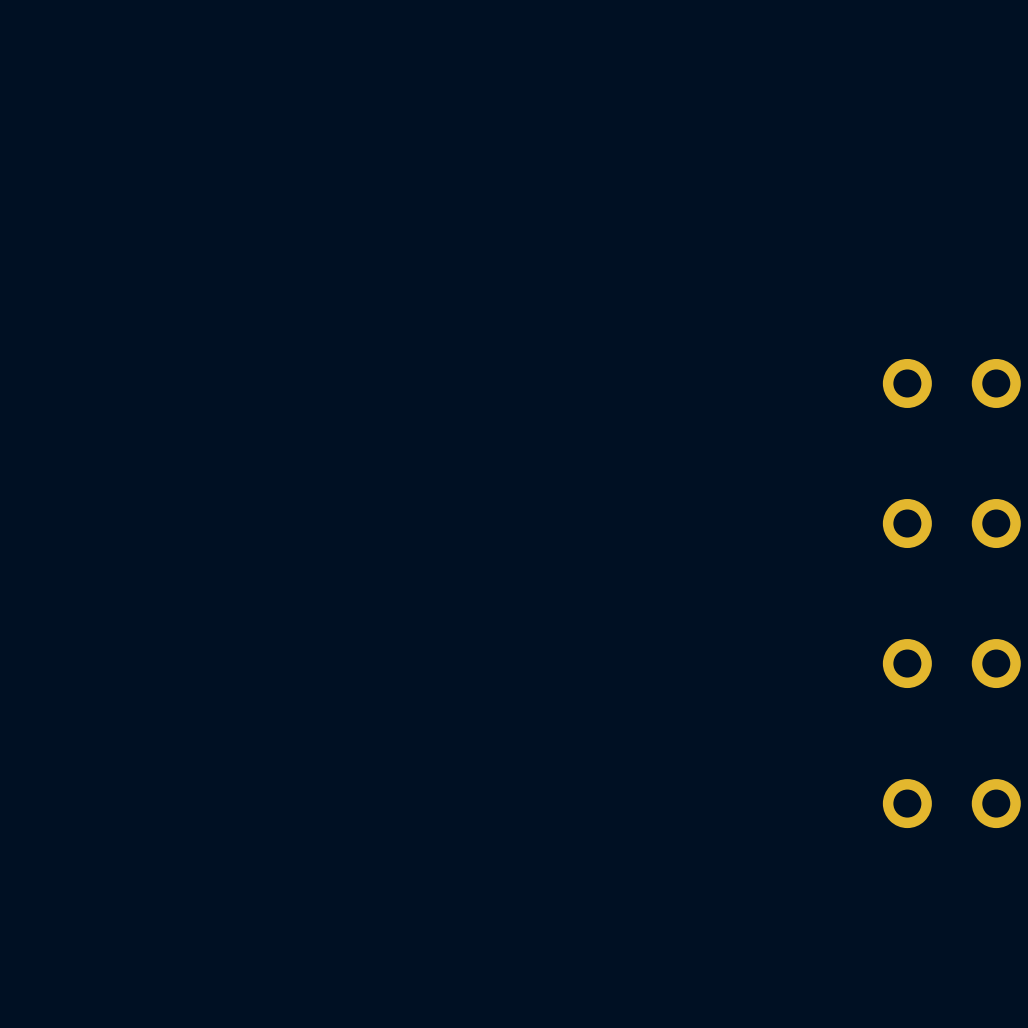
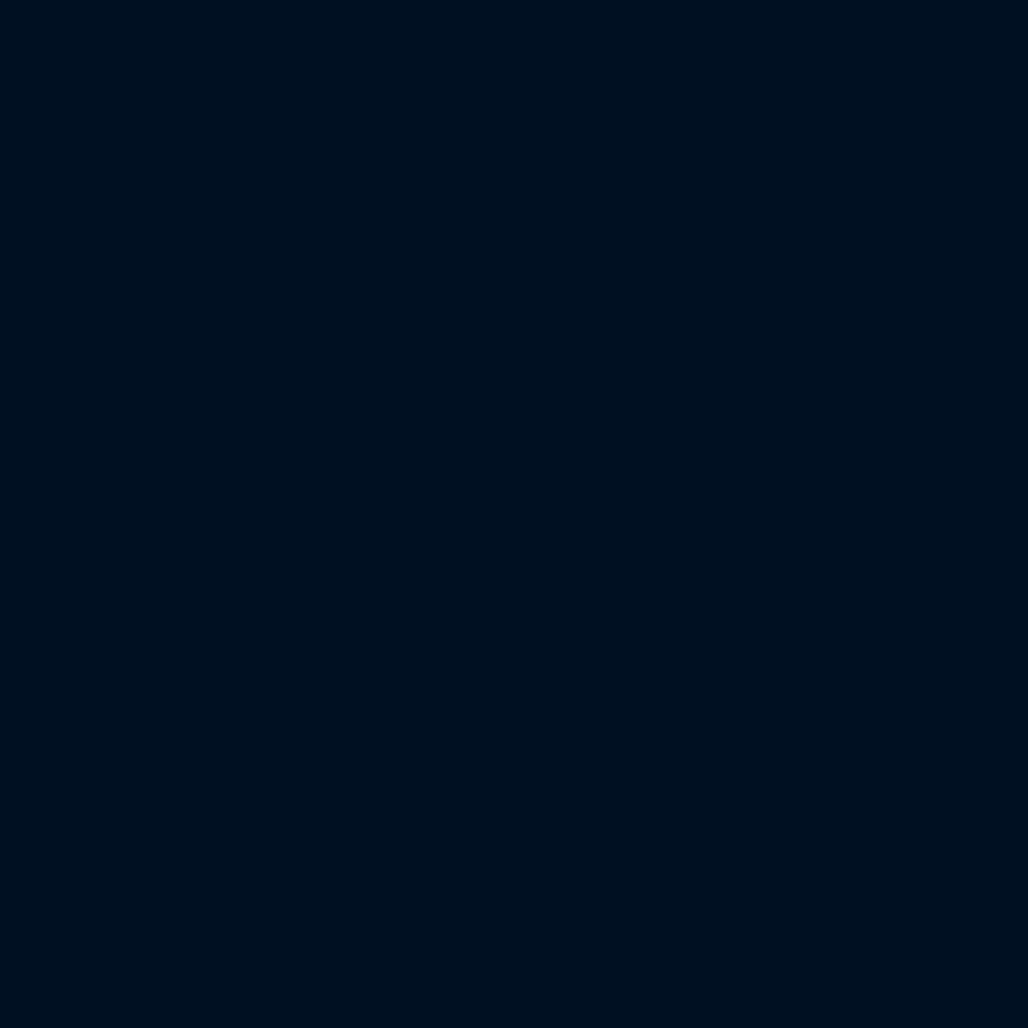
part: (951, 383) -> none
part: (951, 523) -> none
part: (951, 663) -> none
part: (951, 803) -> none

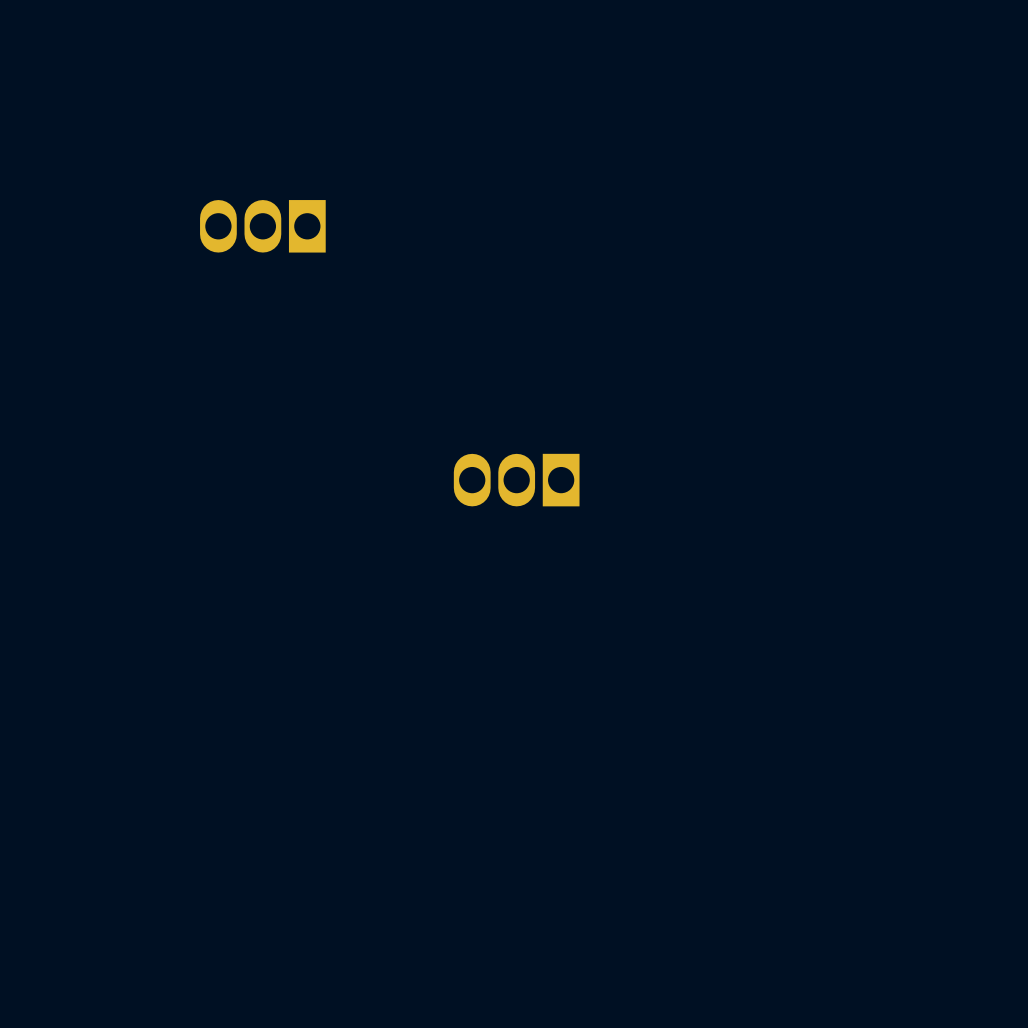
part: none -> (262, 226)
part: none -> (516, 480)

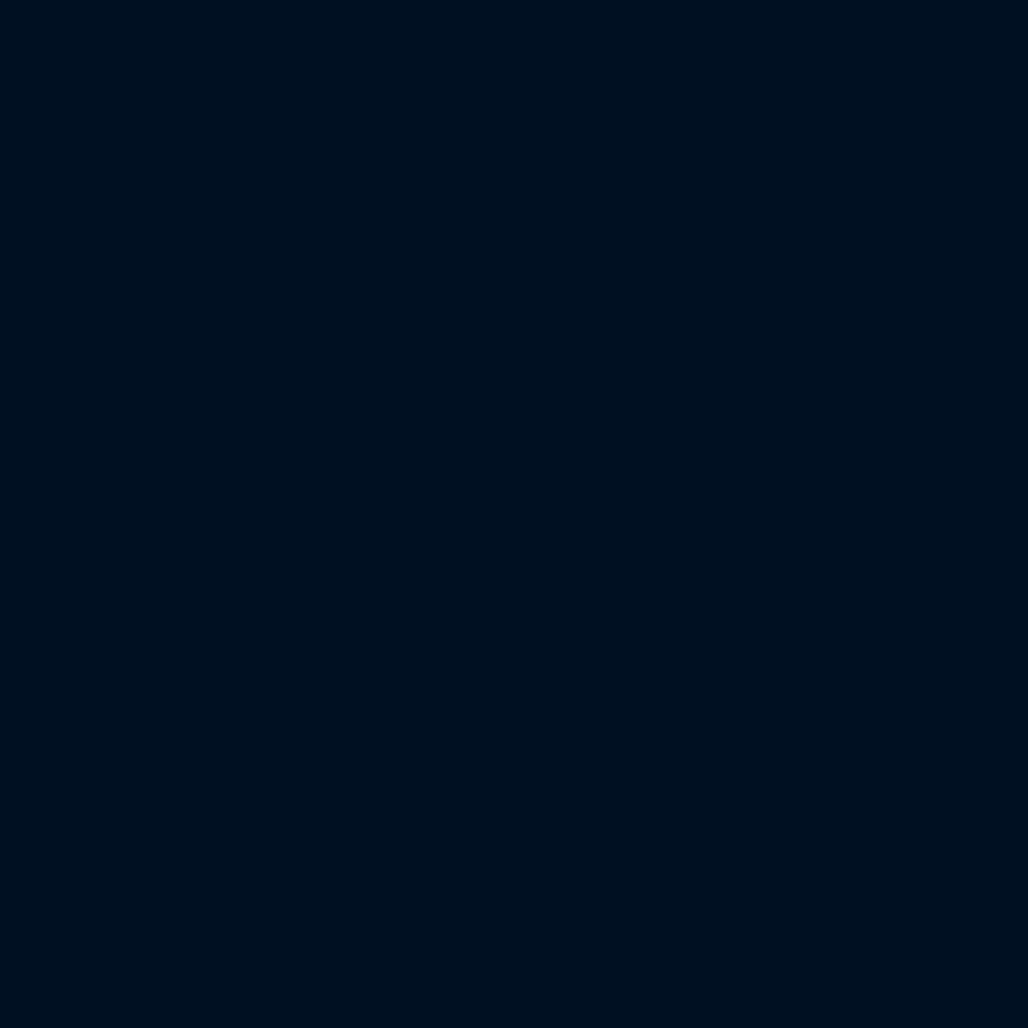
part: (262, 226) -> none
part: (516, 480) -> none

